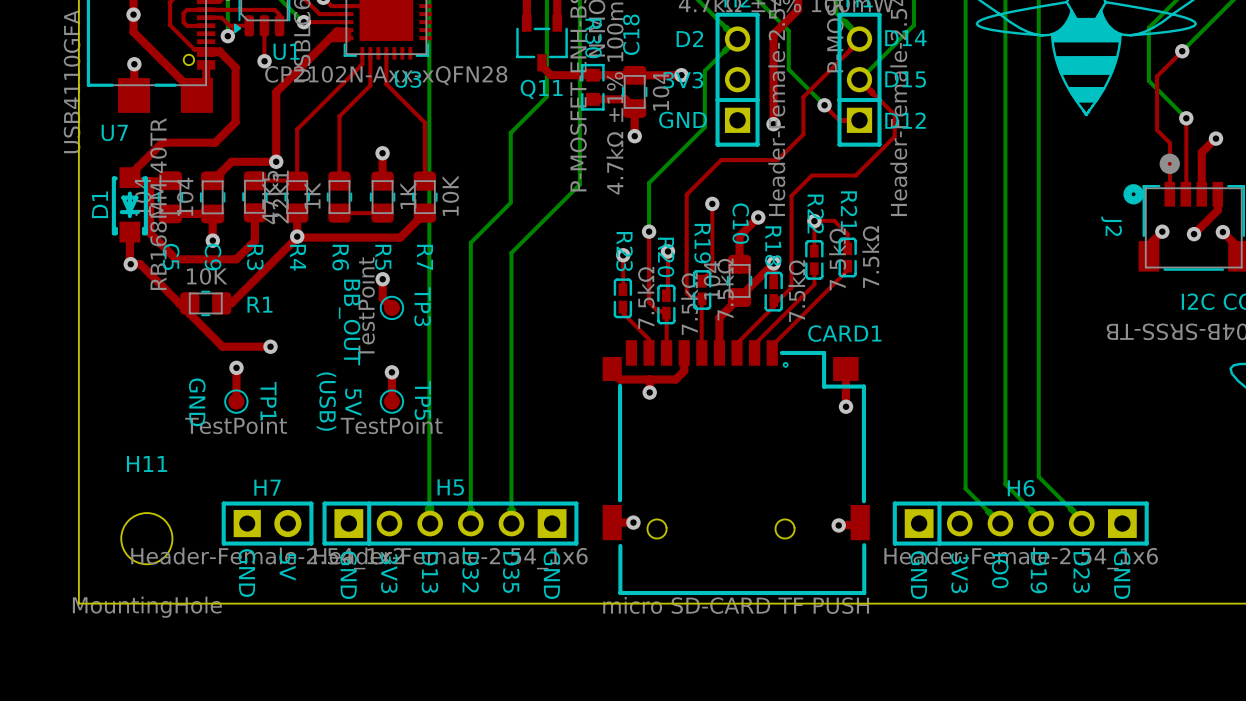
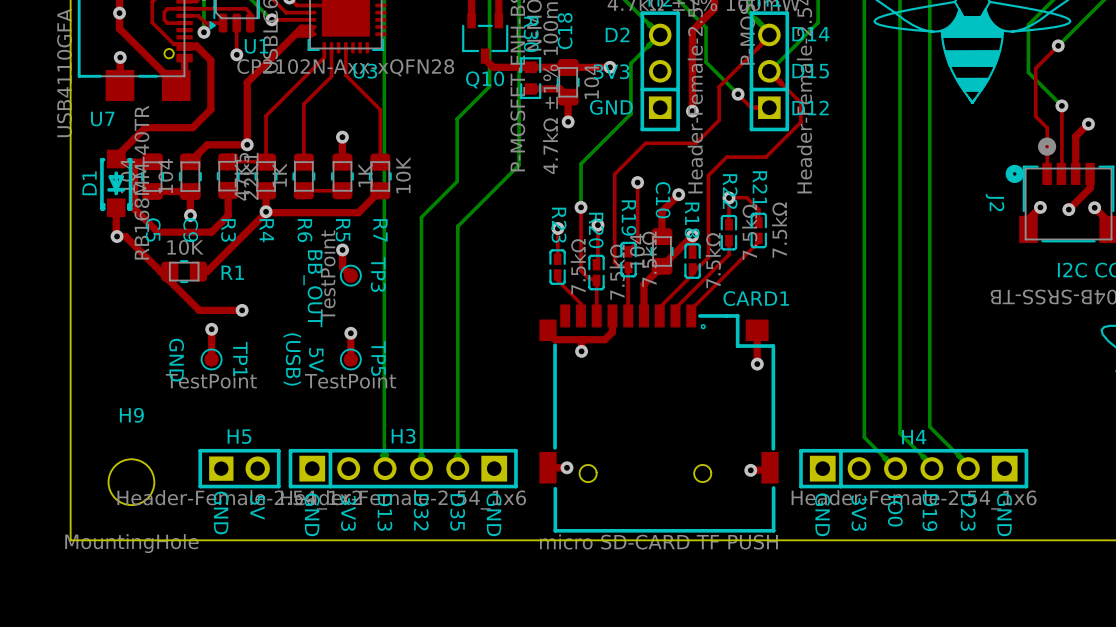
Q11 name: Q11 (541, 89) -> Q10 (485, 79)
H11 name: H11 (147, 463) -> H9 (131, 415)
H7 name: H7 (267, 487) -> H5 (239, 436)
H5 name: H5 (450, 487) -> H3 (403, 436)
H6 name: H6 (1021, 488) -> H4 (914, 437)

